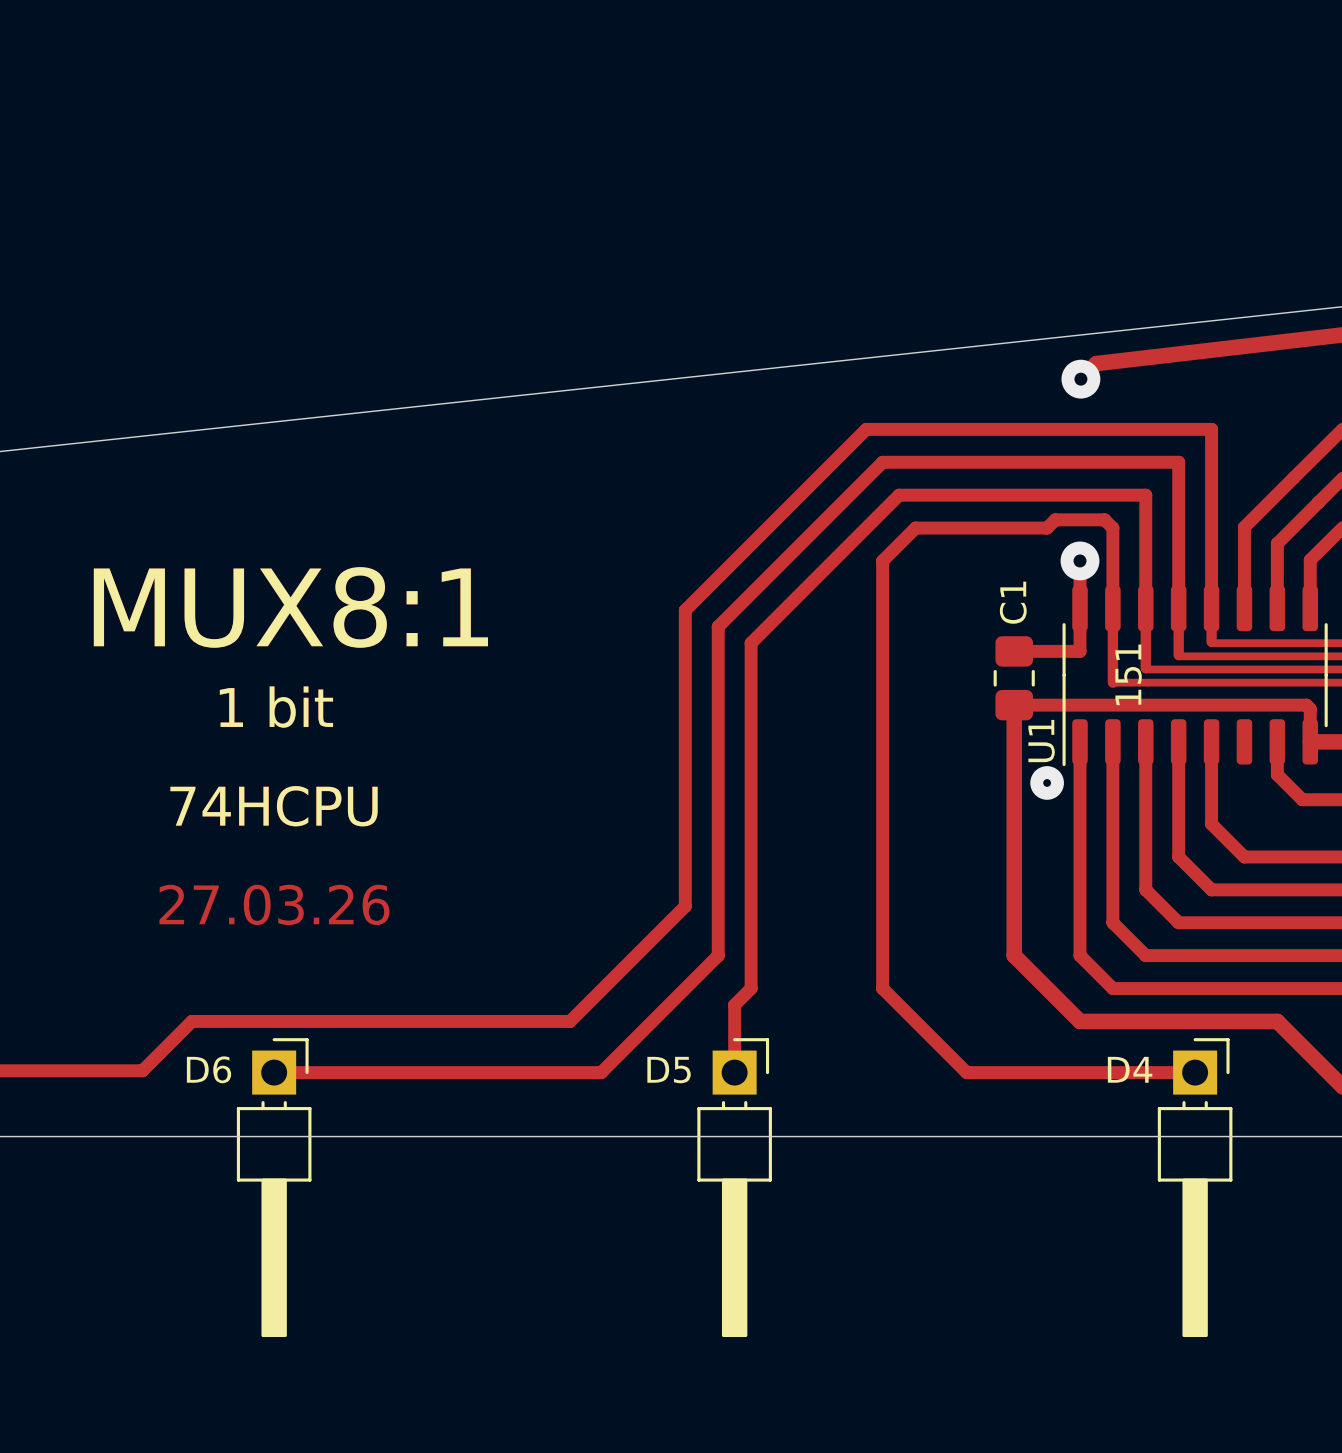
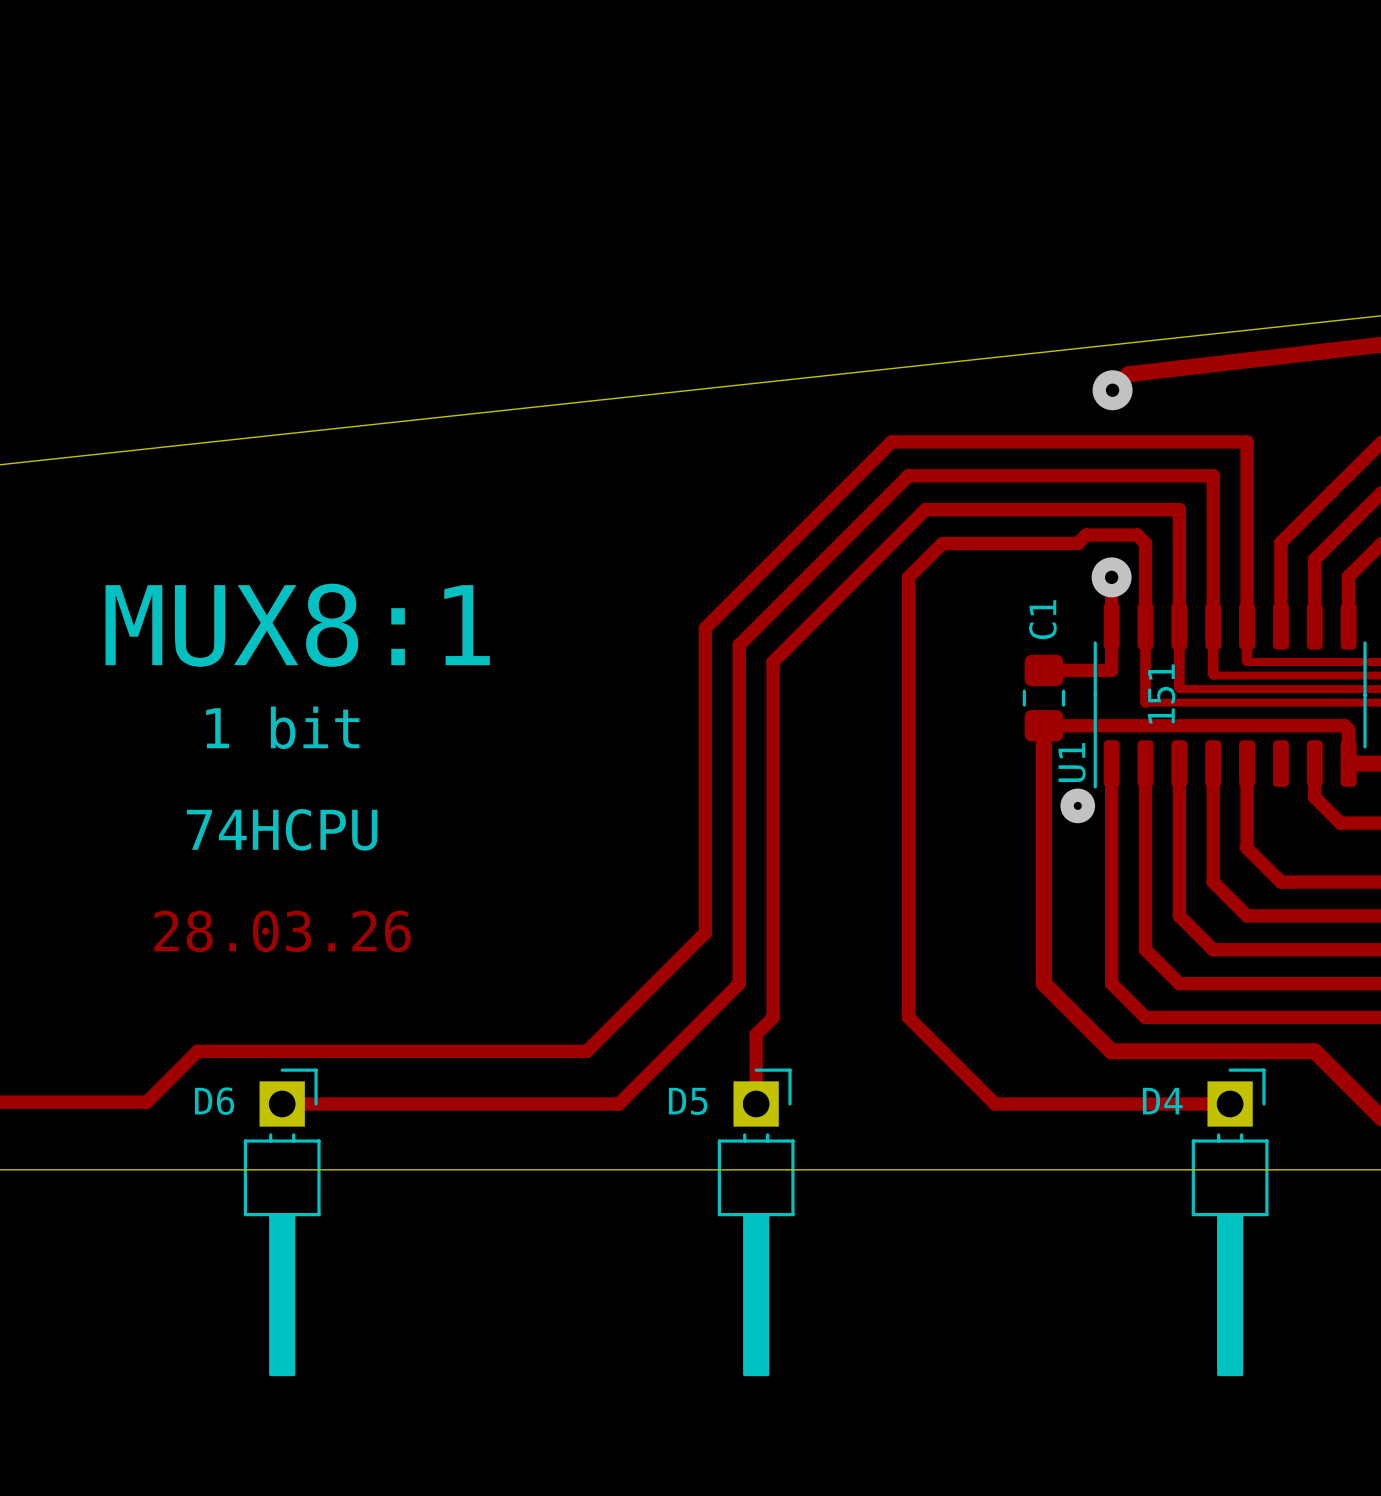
text: 27.03.26 (274, 904) -> 28.03.26 (282, 931)

